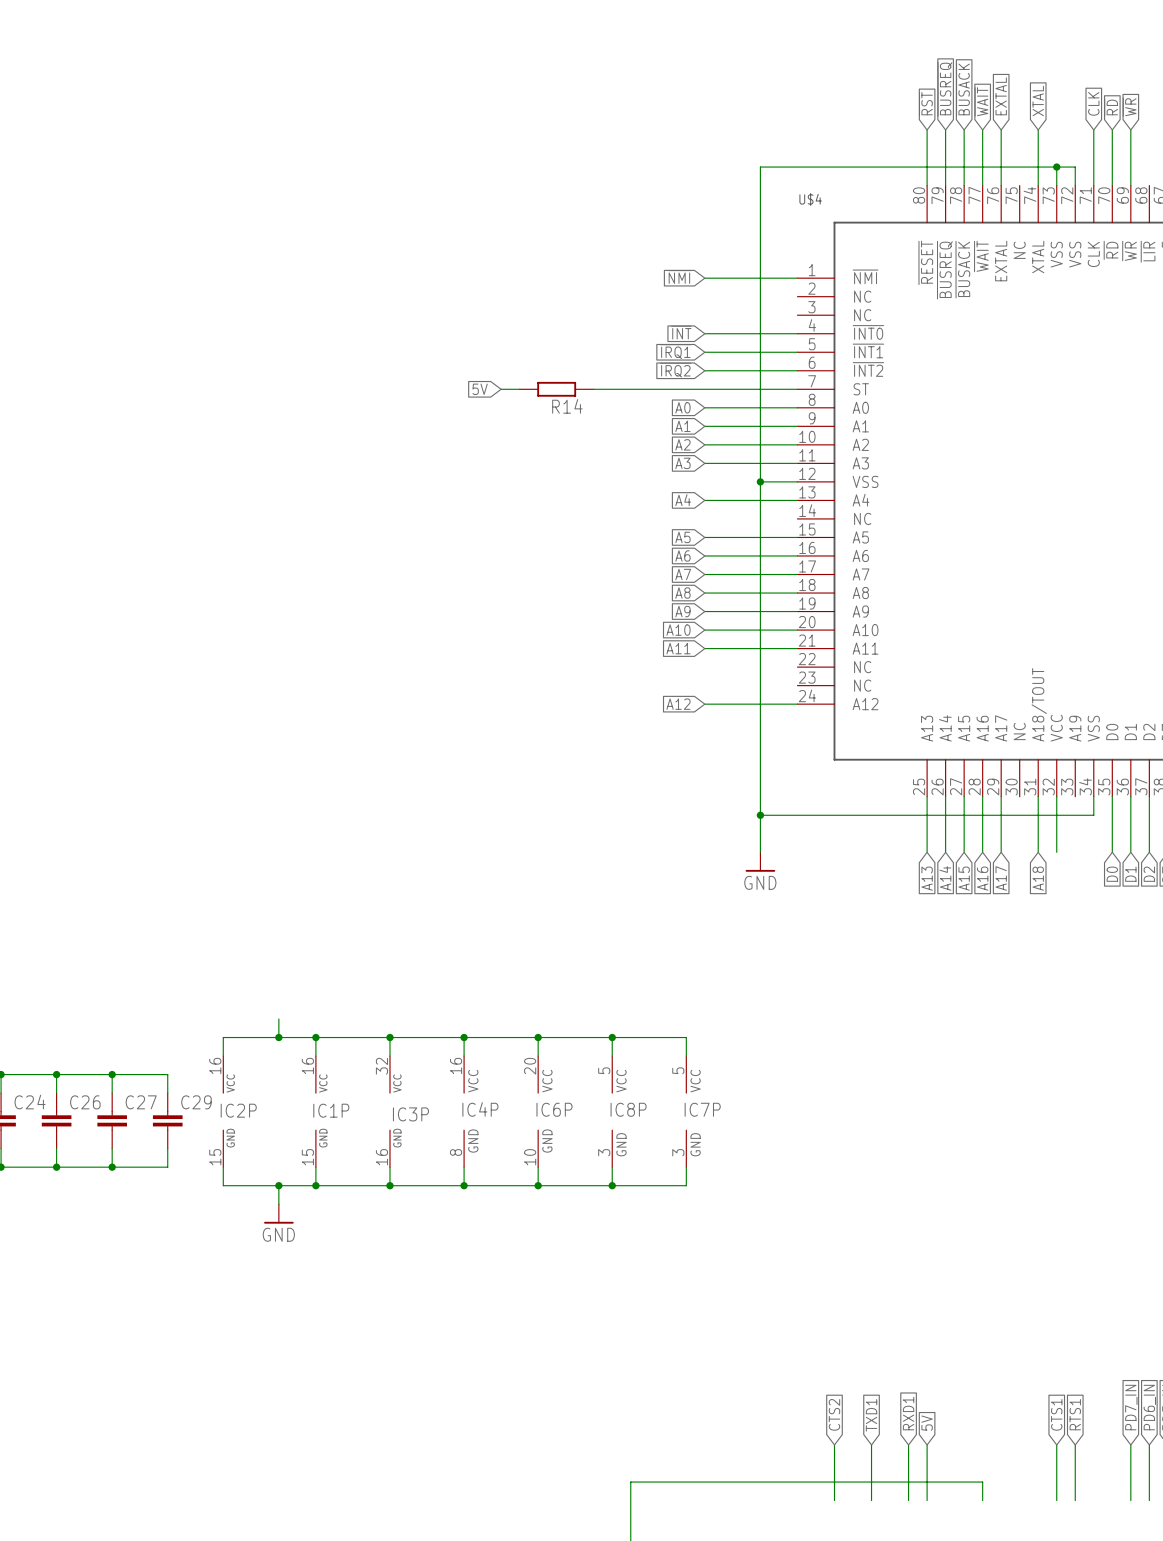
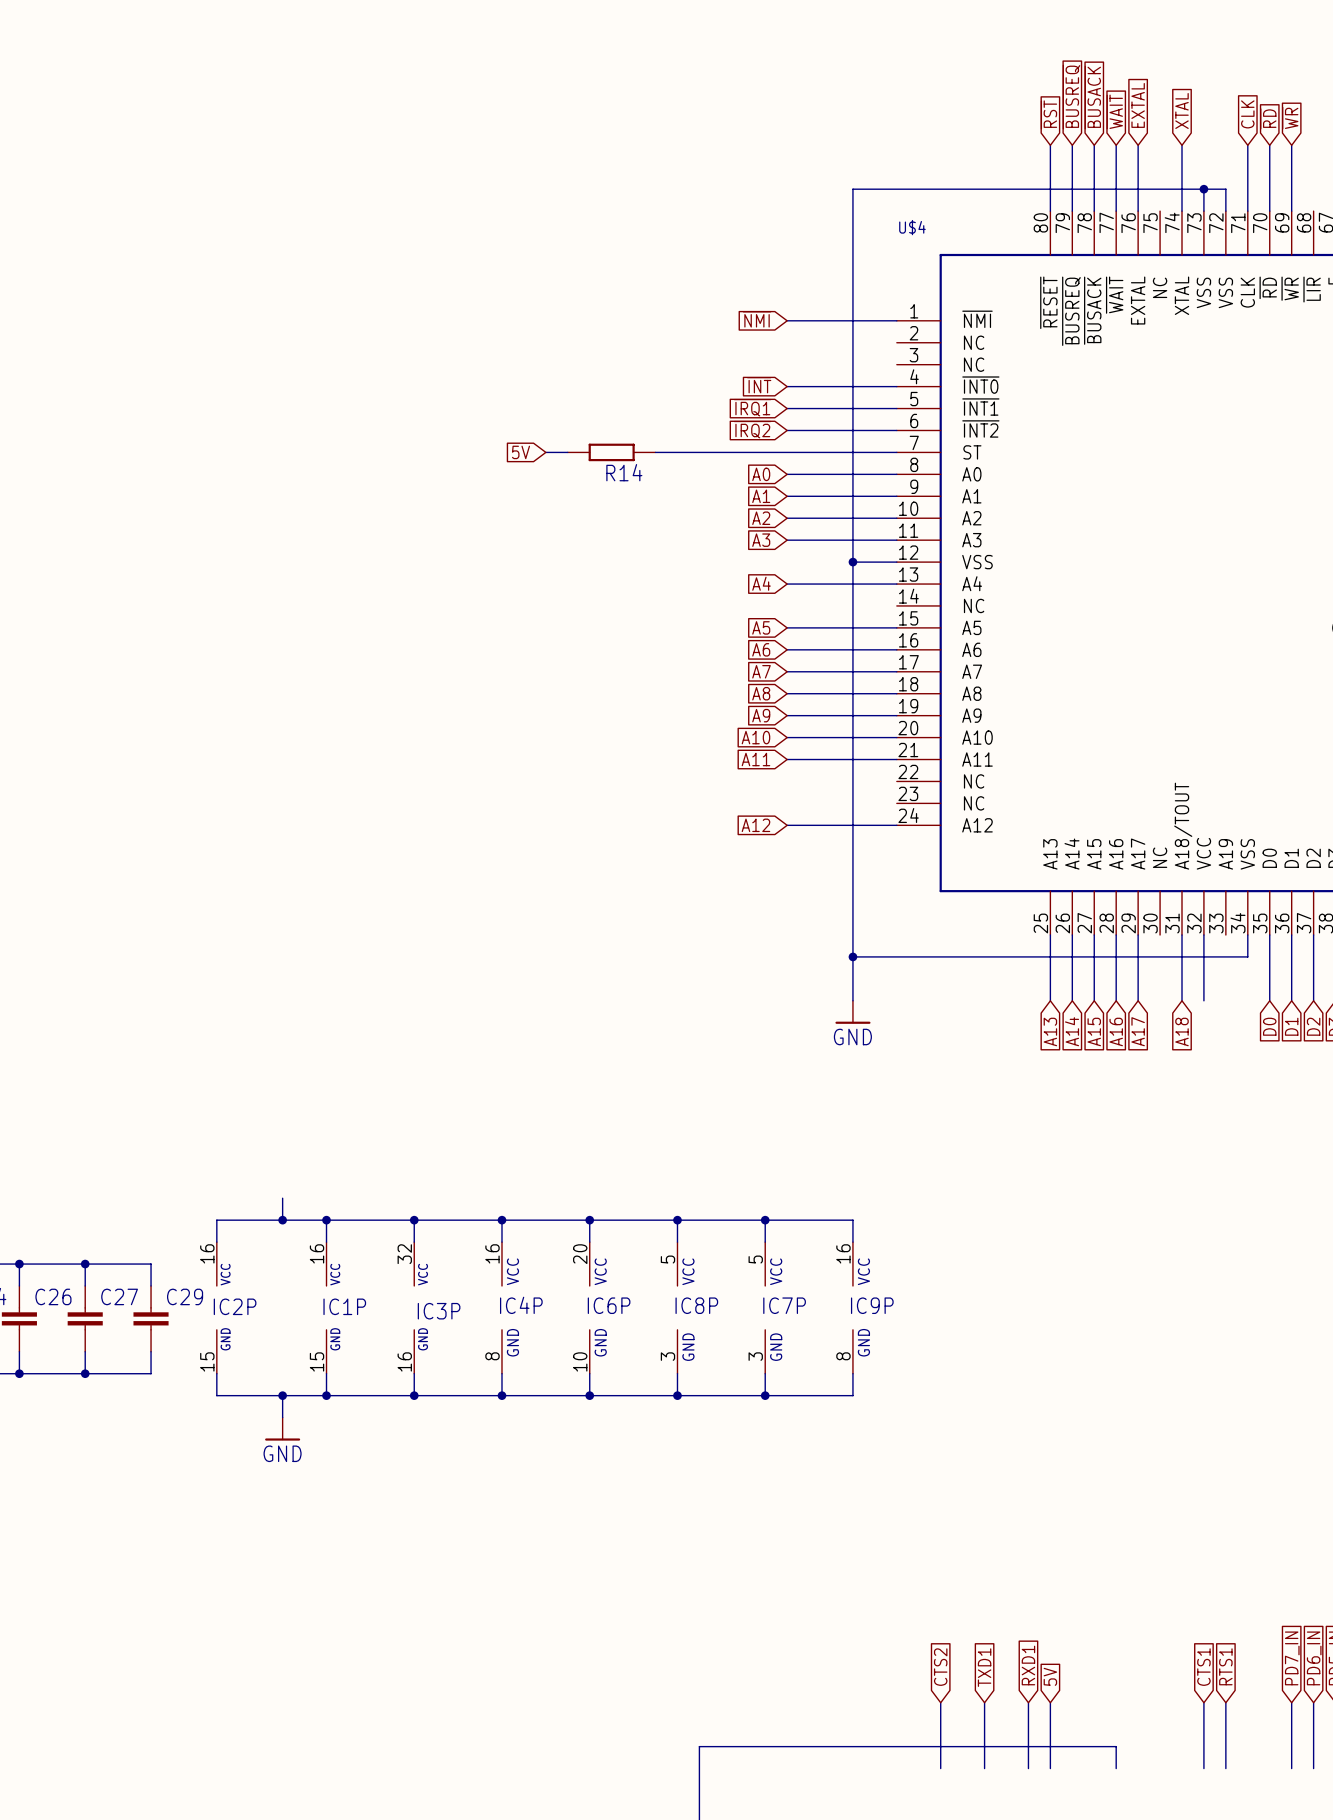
wire: none -> (765, 1220) (852, 1220) (852, 1242)
junction: none -> (765, 1220)
IC9P: none -> (852, 1307)
wire: none -> (852, 1373) (852, 1395) (765, 1395)
junction: none -> (765, 1395)

